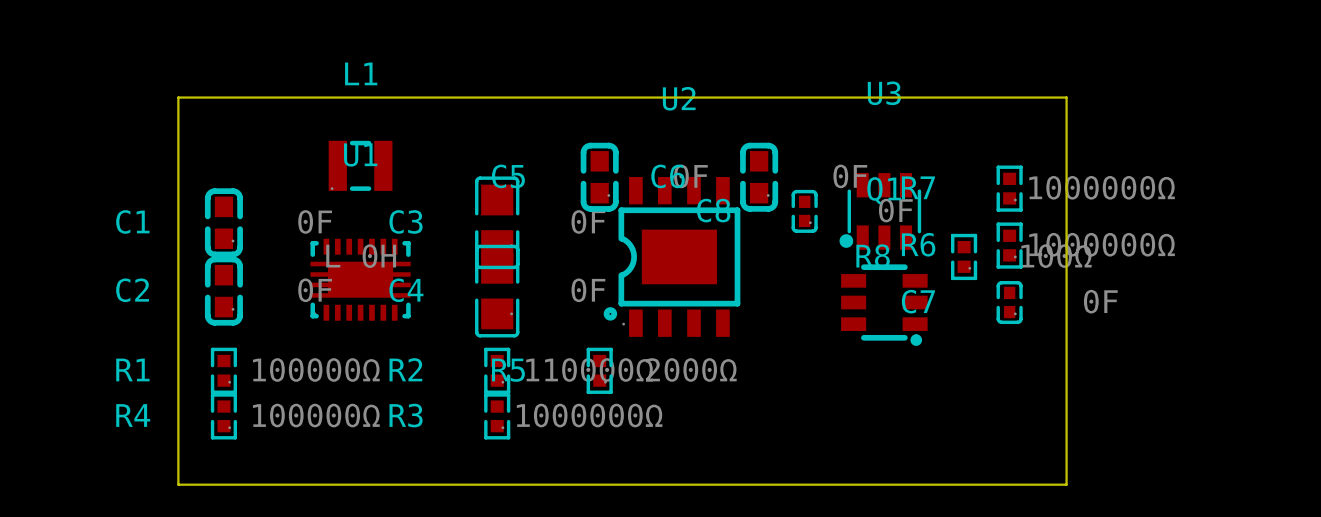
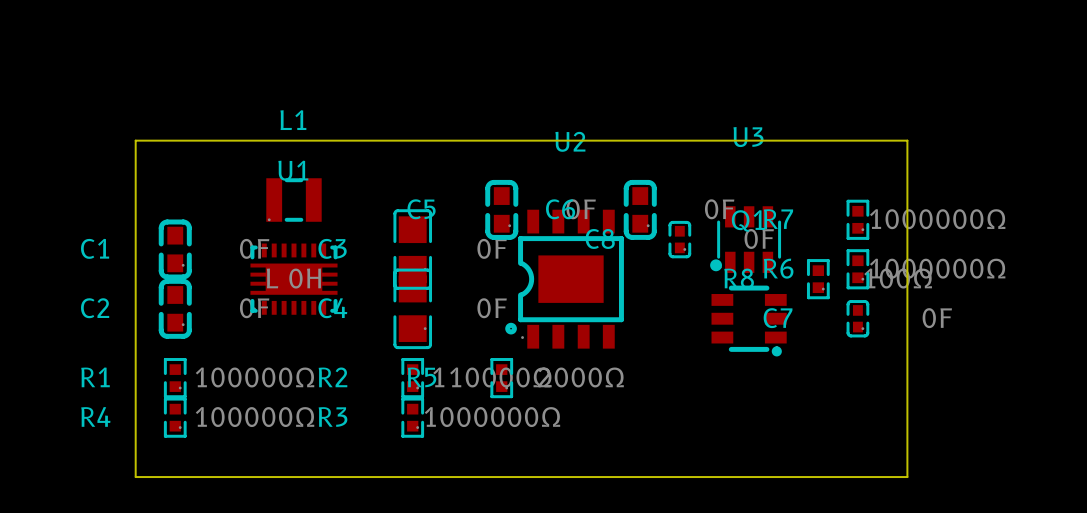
U1 position: (360, 283) -> (293, 282)

